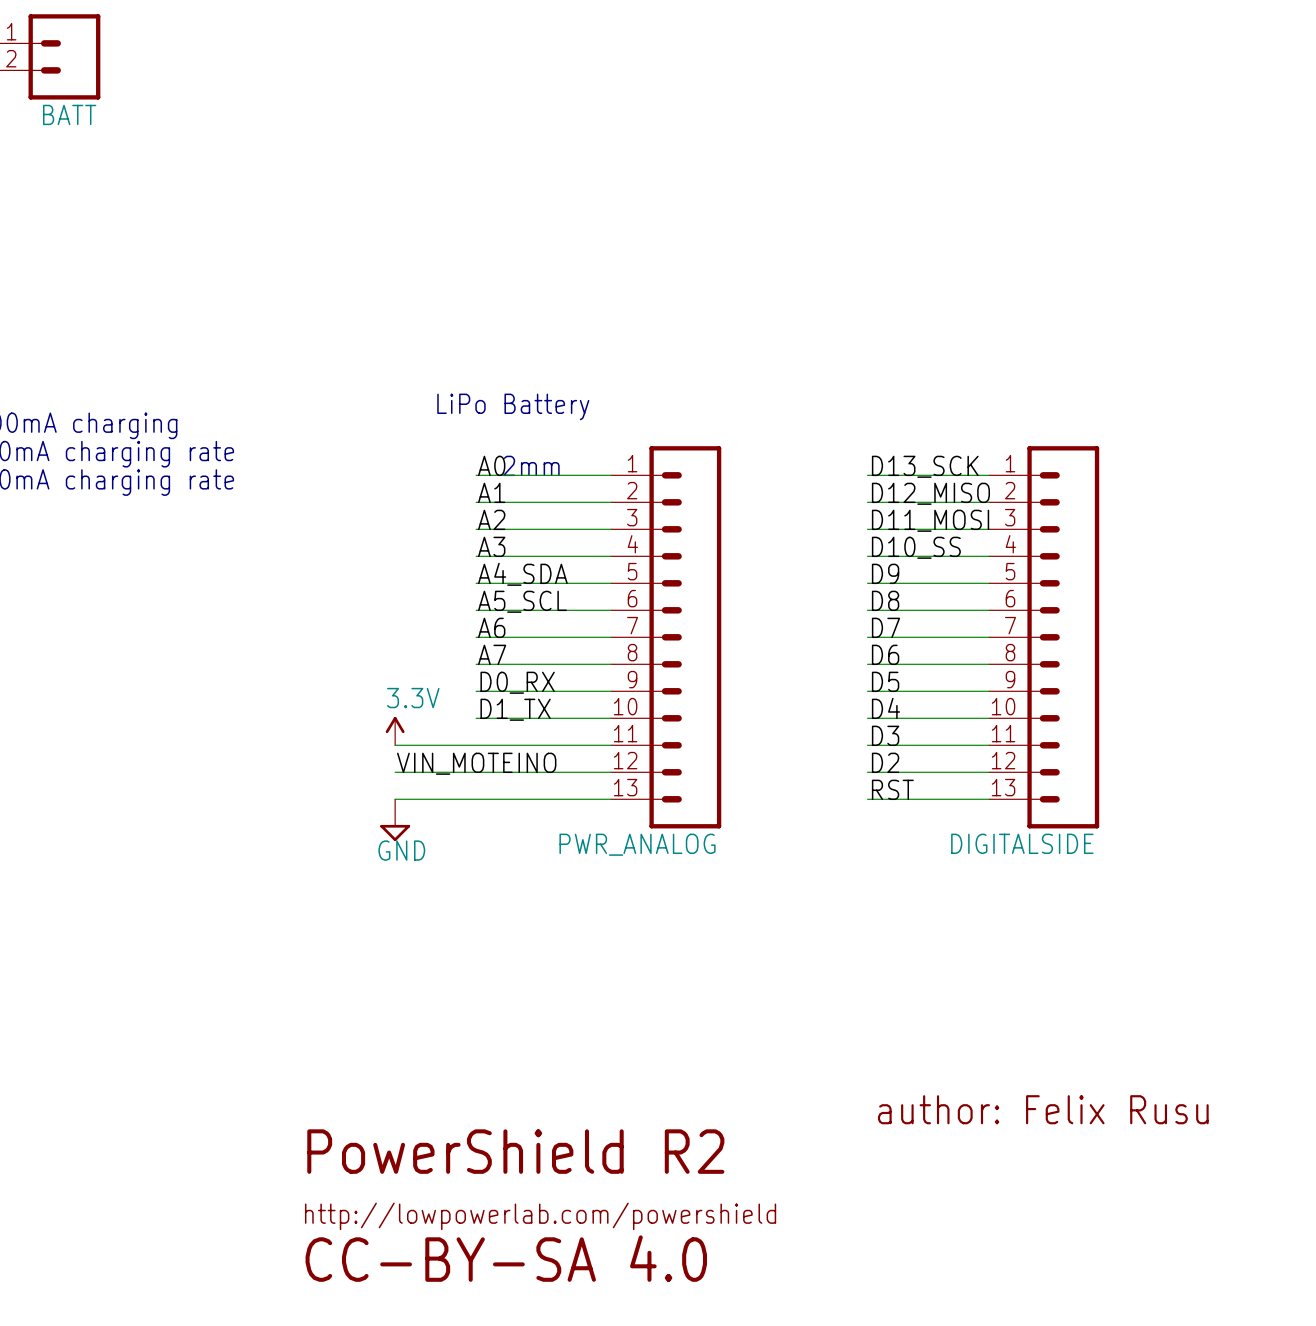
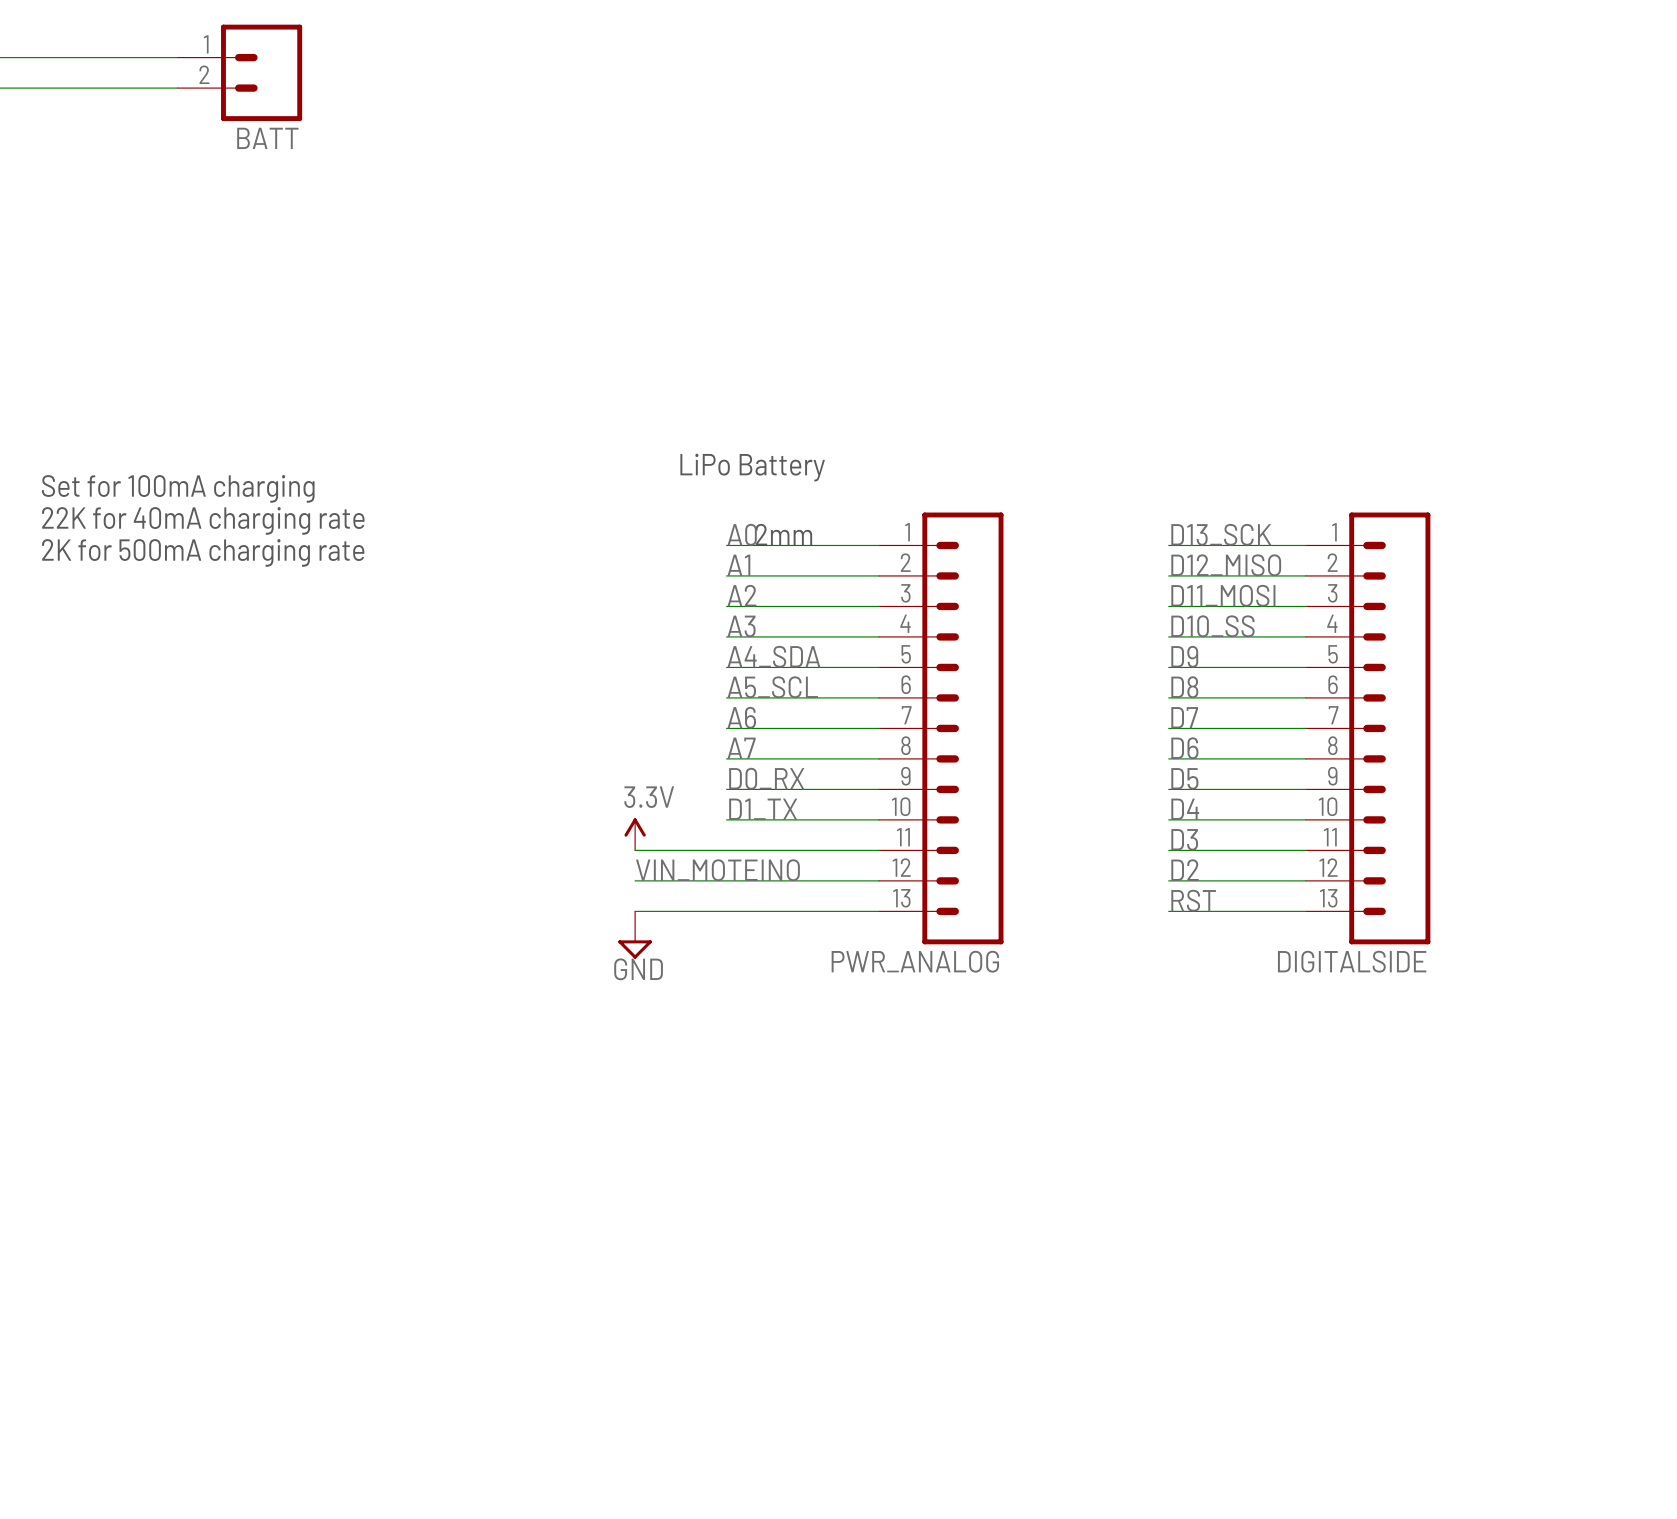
text: author: Felix Rusu (1043, 1109) -> none
text: PowerShield R2 (515, 1151) -> none
text: http://lowpowerlab.com/powershield (540, 1216) -> none
text: CC-BY-SA 4.0 (506, 1258) -> none

